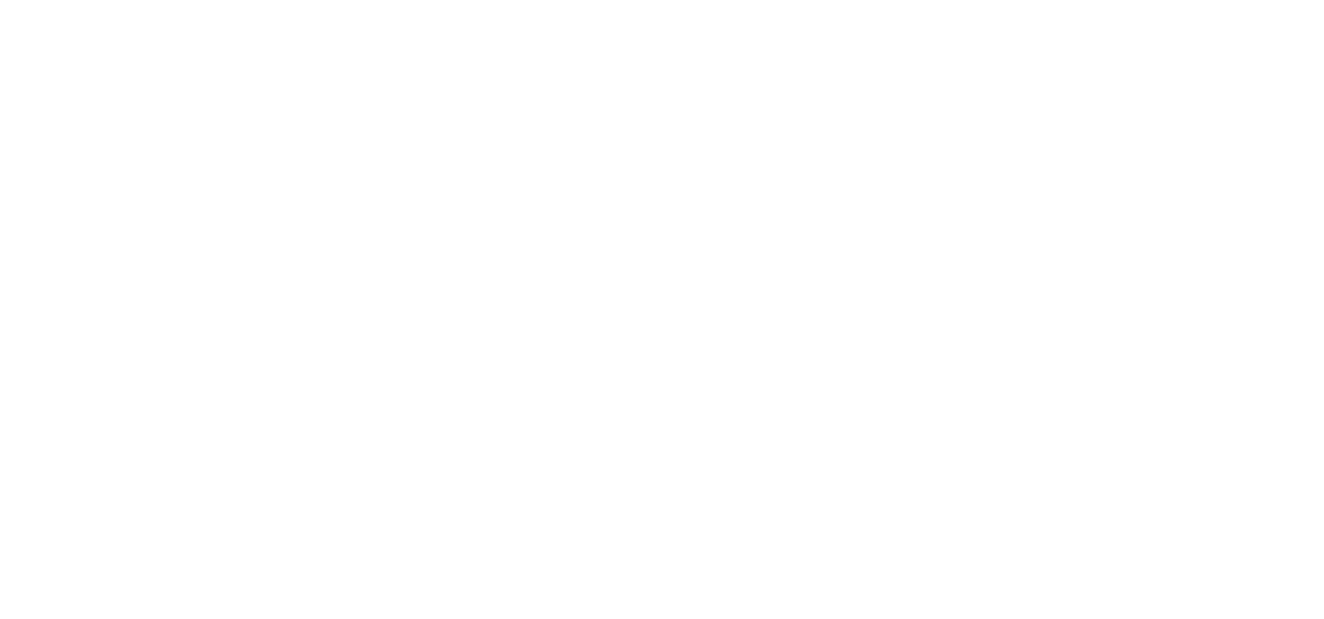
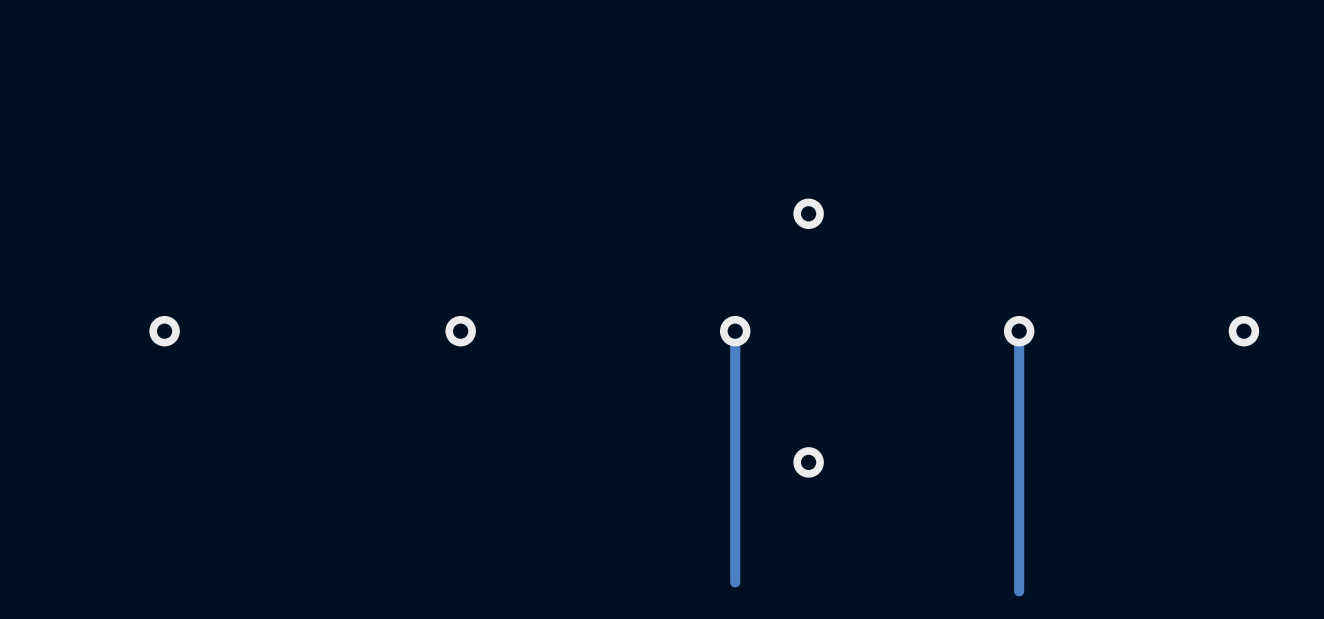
via: none -> (808, 213)
via: none -> (164, 331)
via: none -> (460, 331)
track: none -> (735, 331) (735, 582)
via: none -> (735, 331)
track: none -> (1019, 331) (1019, 591)
via: none -> (1019, 331)
via: none -> (1243, 331)
via: none -> (808, 462)

